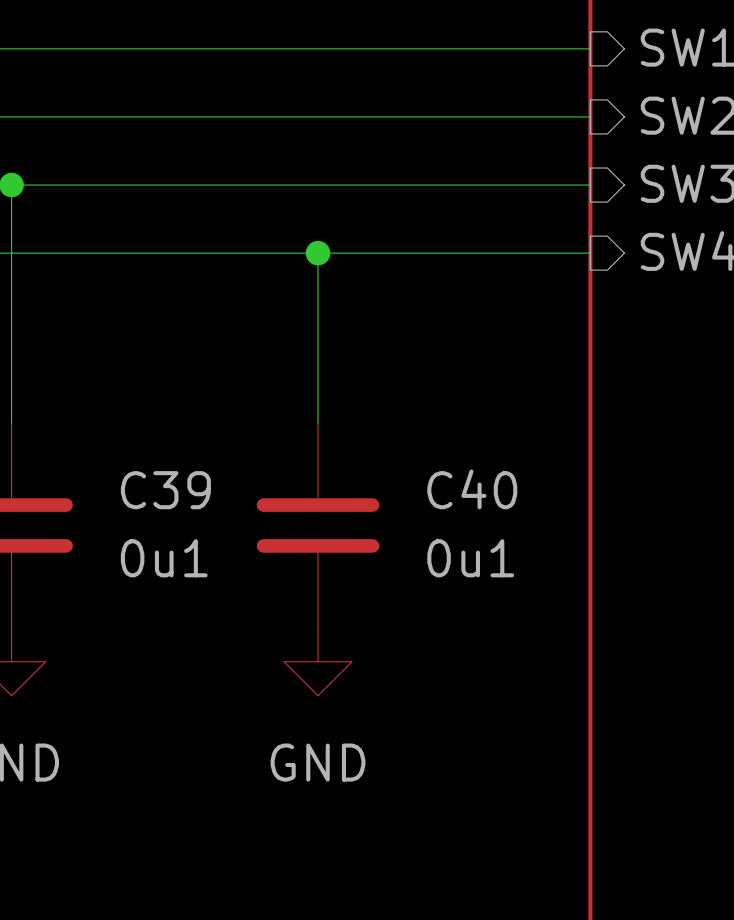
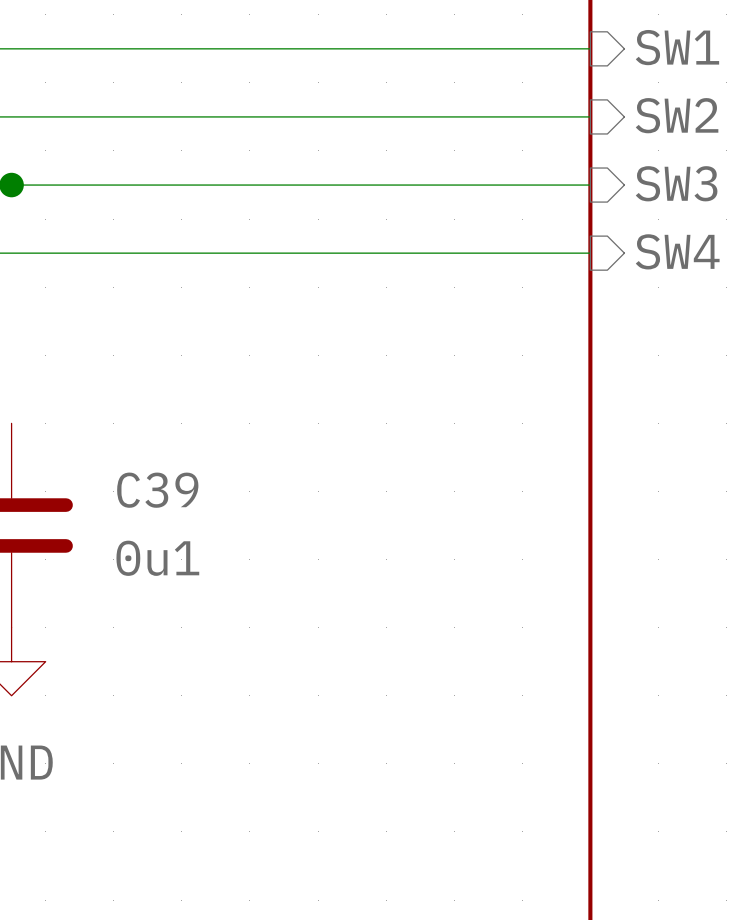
wire: (11, 185) (11, 423) -> none
wire: (318, 253) (318, 423) -> none
junction: (318, 253) -> none
C40: 0u1 (318, 525) -> none
power symbol: GND (318, 661) -> none

